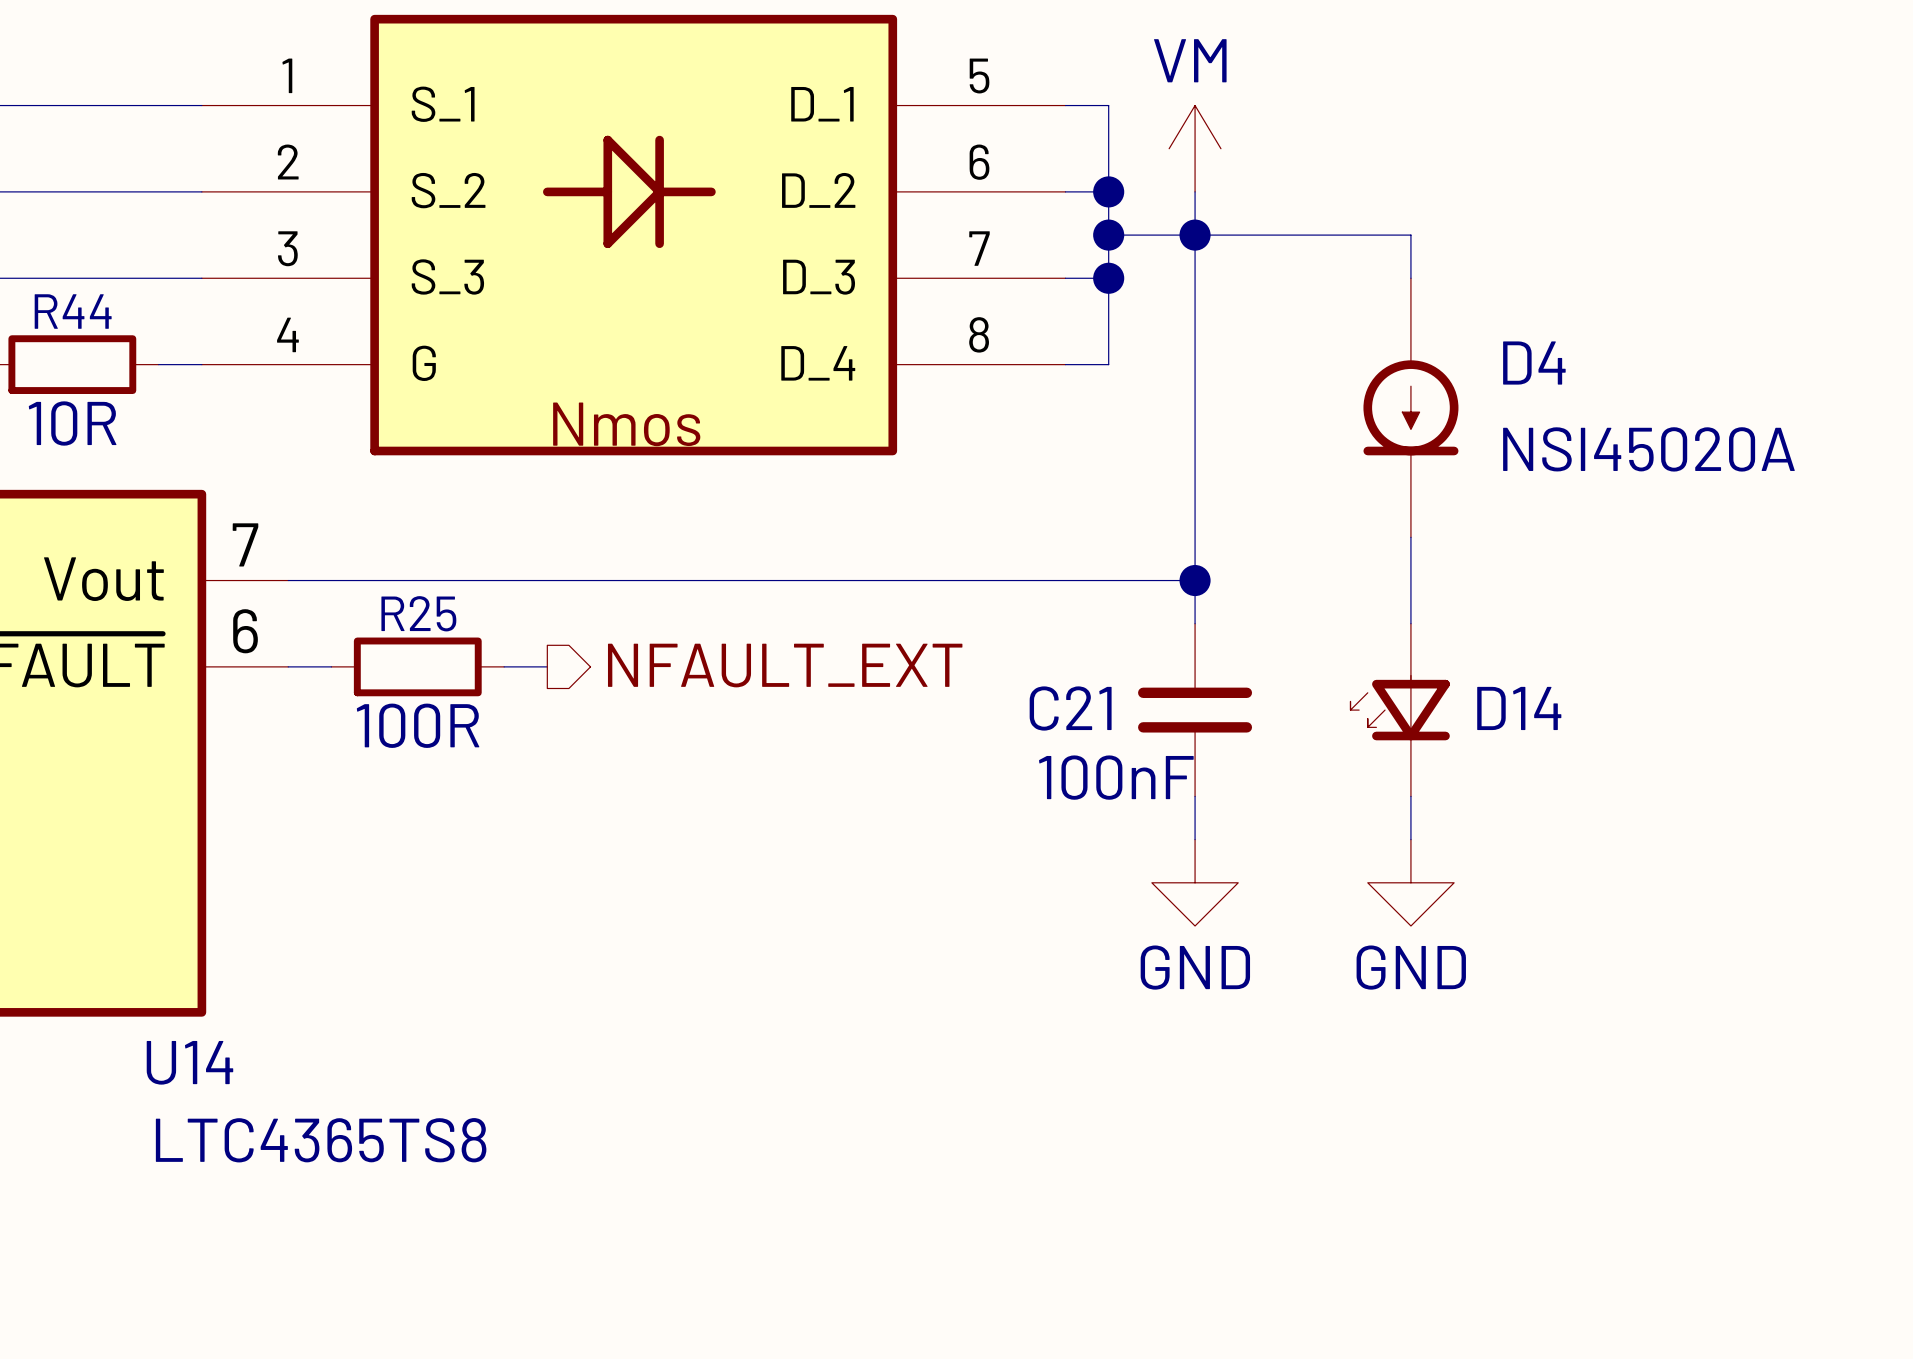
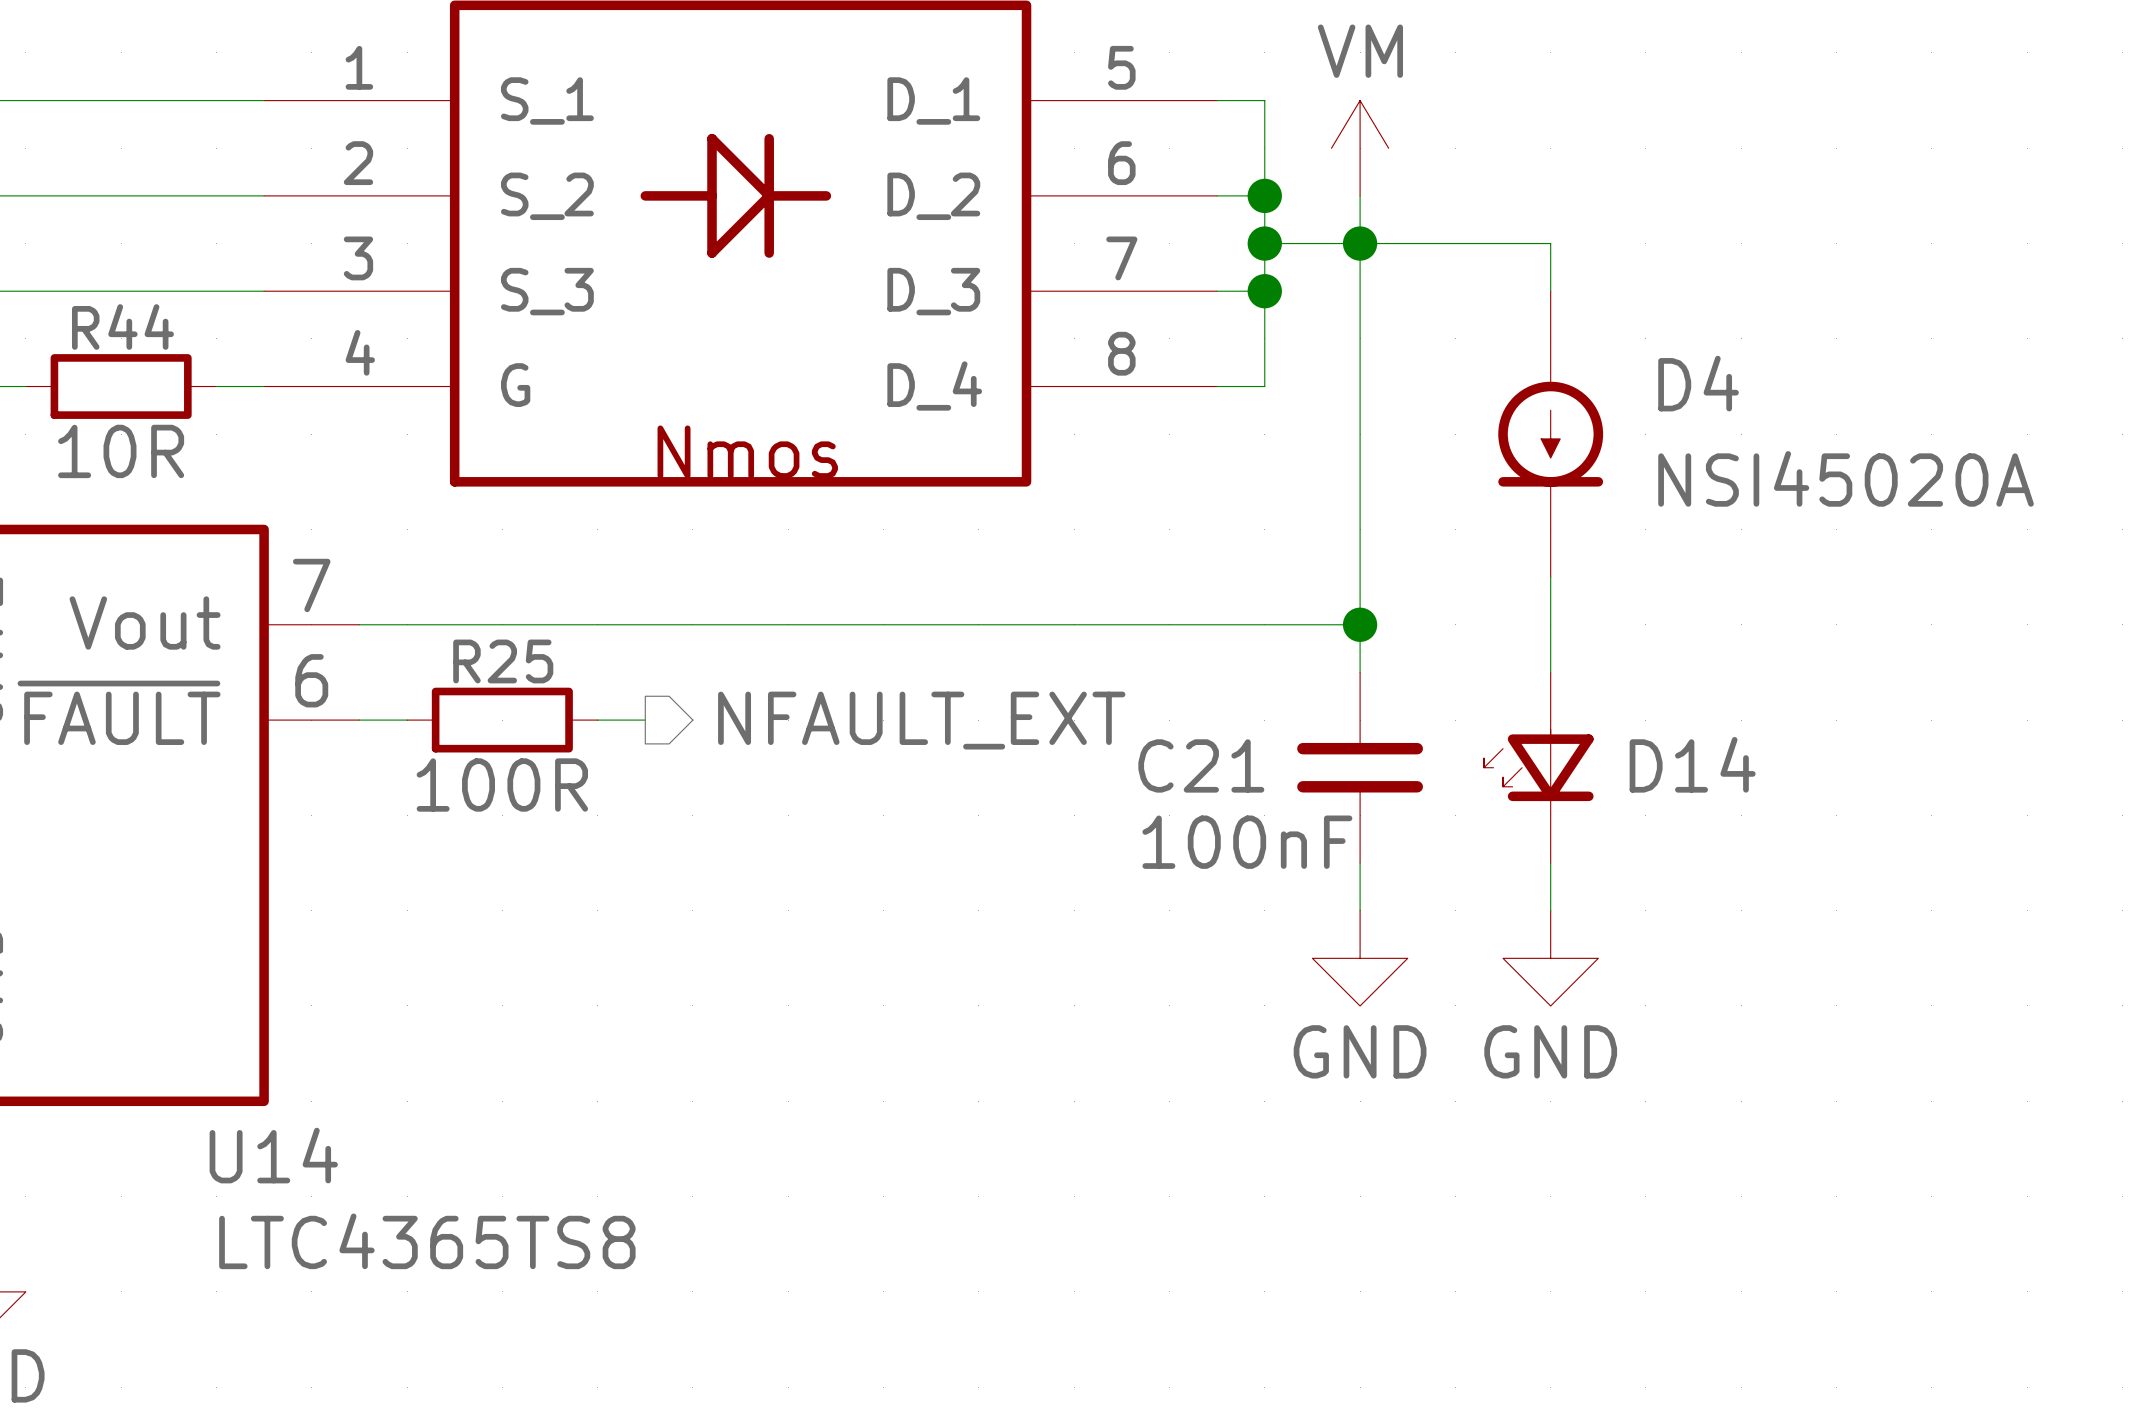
wire: (1367, 235) (1410, 235) (1410, 278) -> (1550, 243) (1550, 291)
D4 position: (1410, 407) -> (1550, 434)
wire: (1410, 537) (1410, 623) -> (1550, 577) (1550, 672)
D14 position: (1400, 710) -> (1538, 767)
wire: (1410, 796) (1410, 839) -> (1550, 863) (1550, 910)
power symbol position: GND (1410, 882) -> GND (1550, 958)

